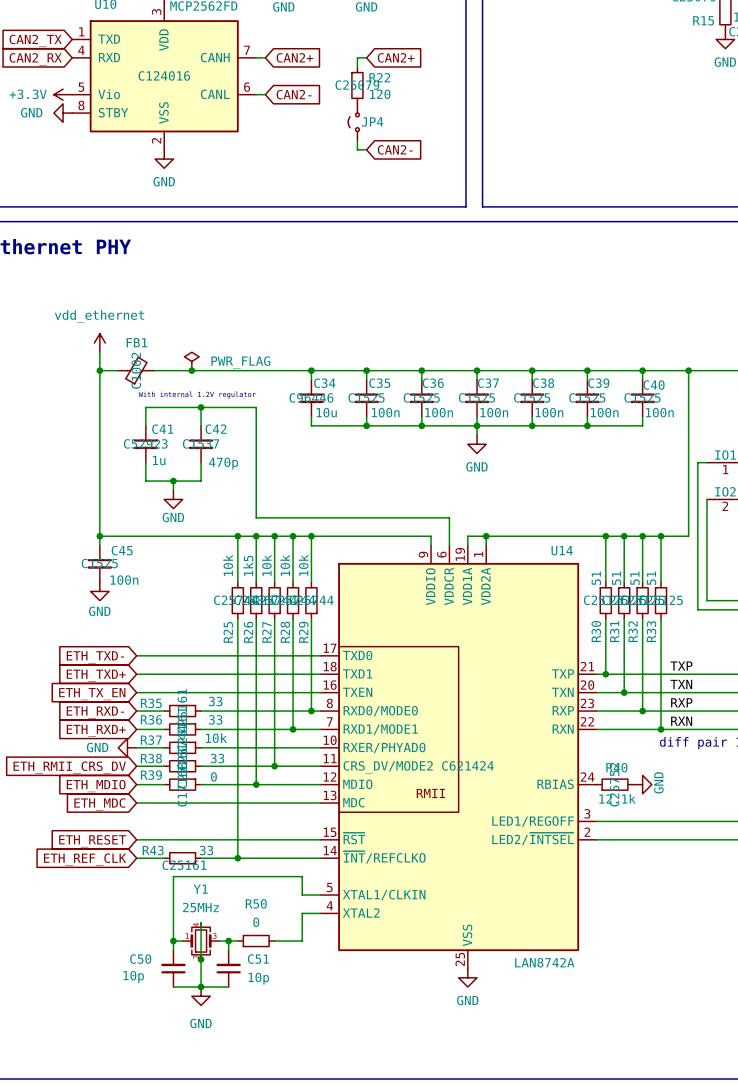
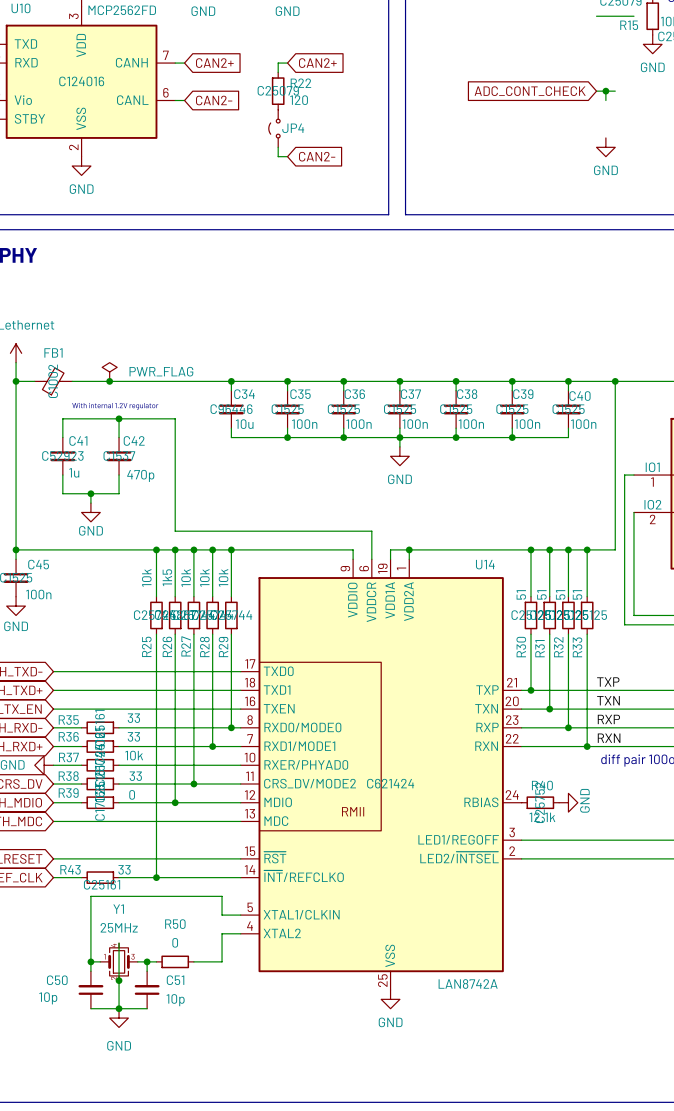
wire: none -> (596, 16) (633, 16)
wire: none -> (596, 91) (615, 91)
wire: none -> (605, 91) (605, 100)
junction: none -> (605, 91)
global label: none -> ADC_CONT_CHECK (530, 91)
power symbol: none -> GND (605, 147)

